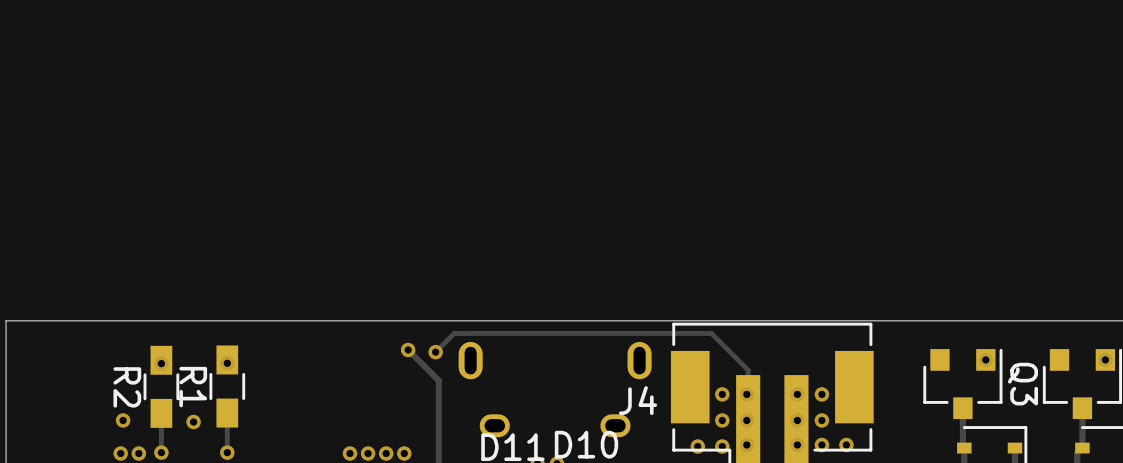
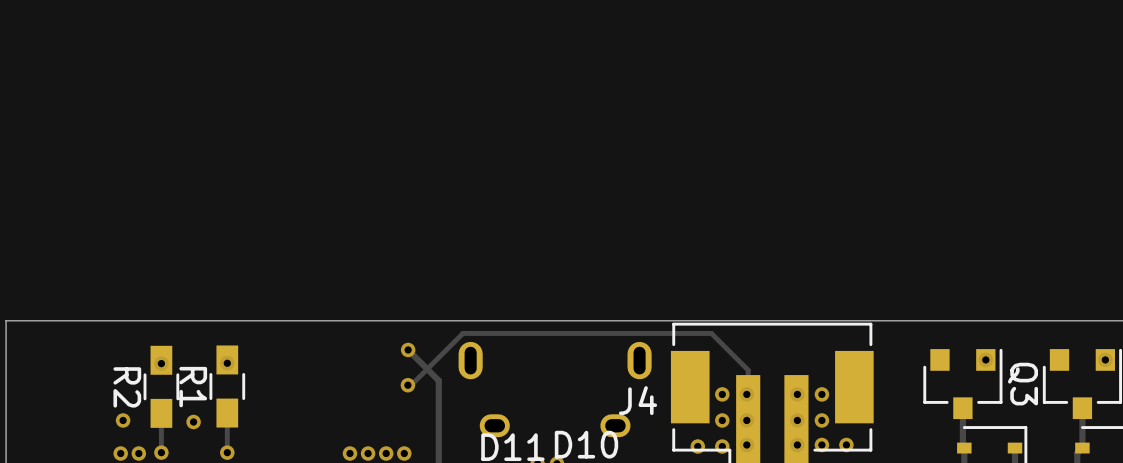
track: (462, 333) (454, 333) (435, 352) -> (462, 333) (411, 385) (407, 385)
via position: (435, 352) -> (407, 385)

